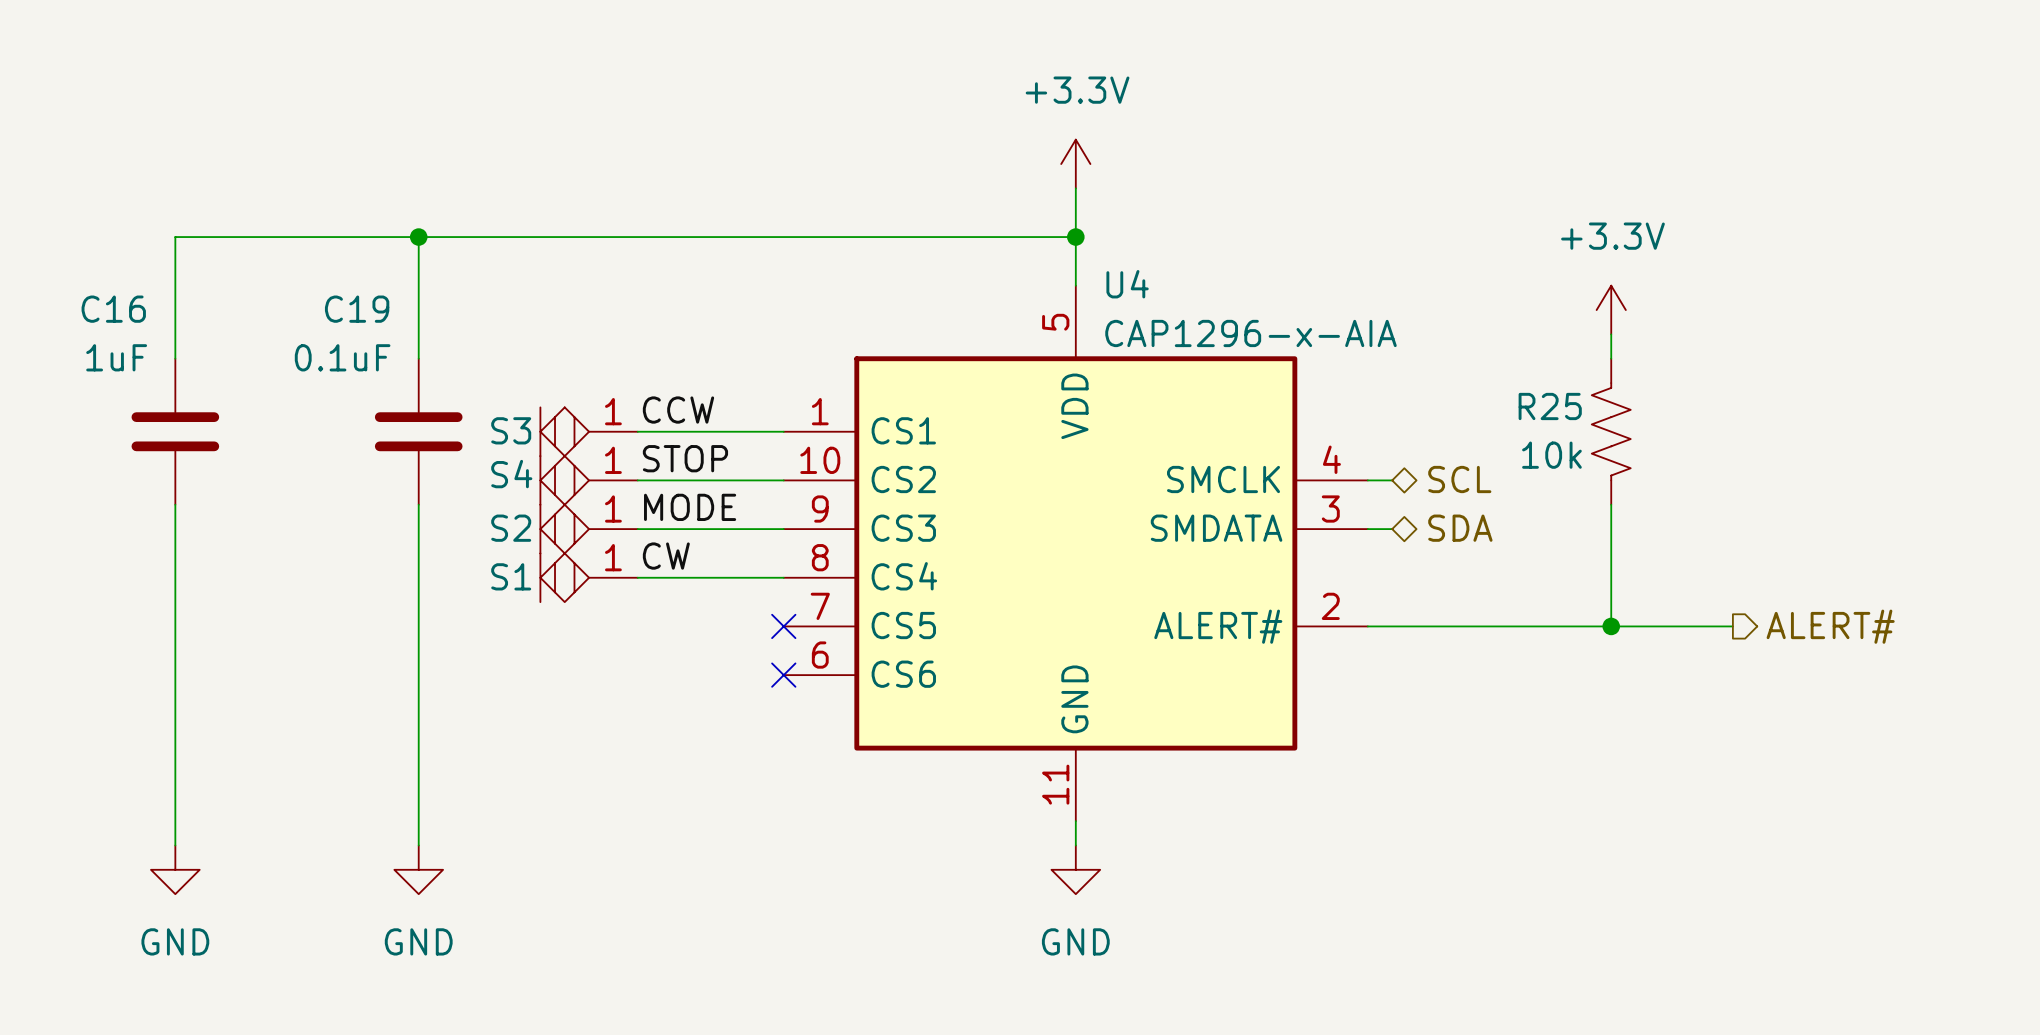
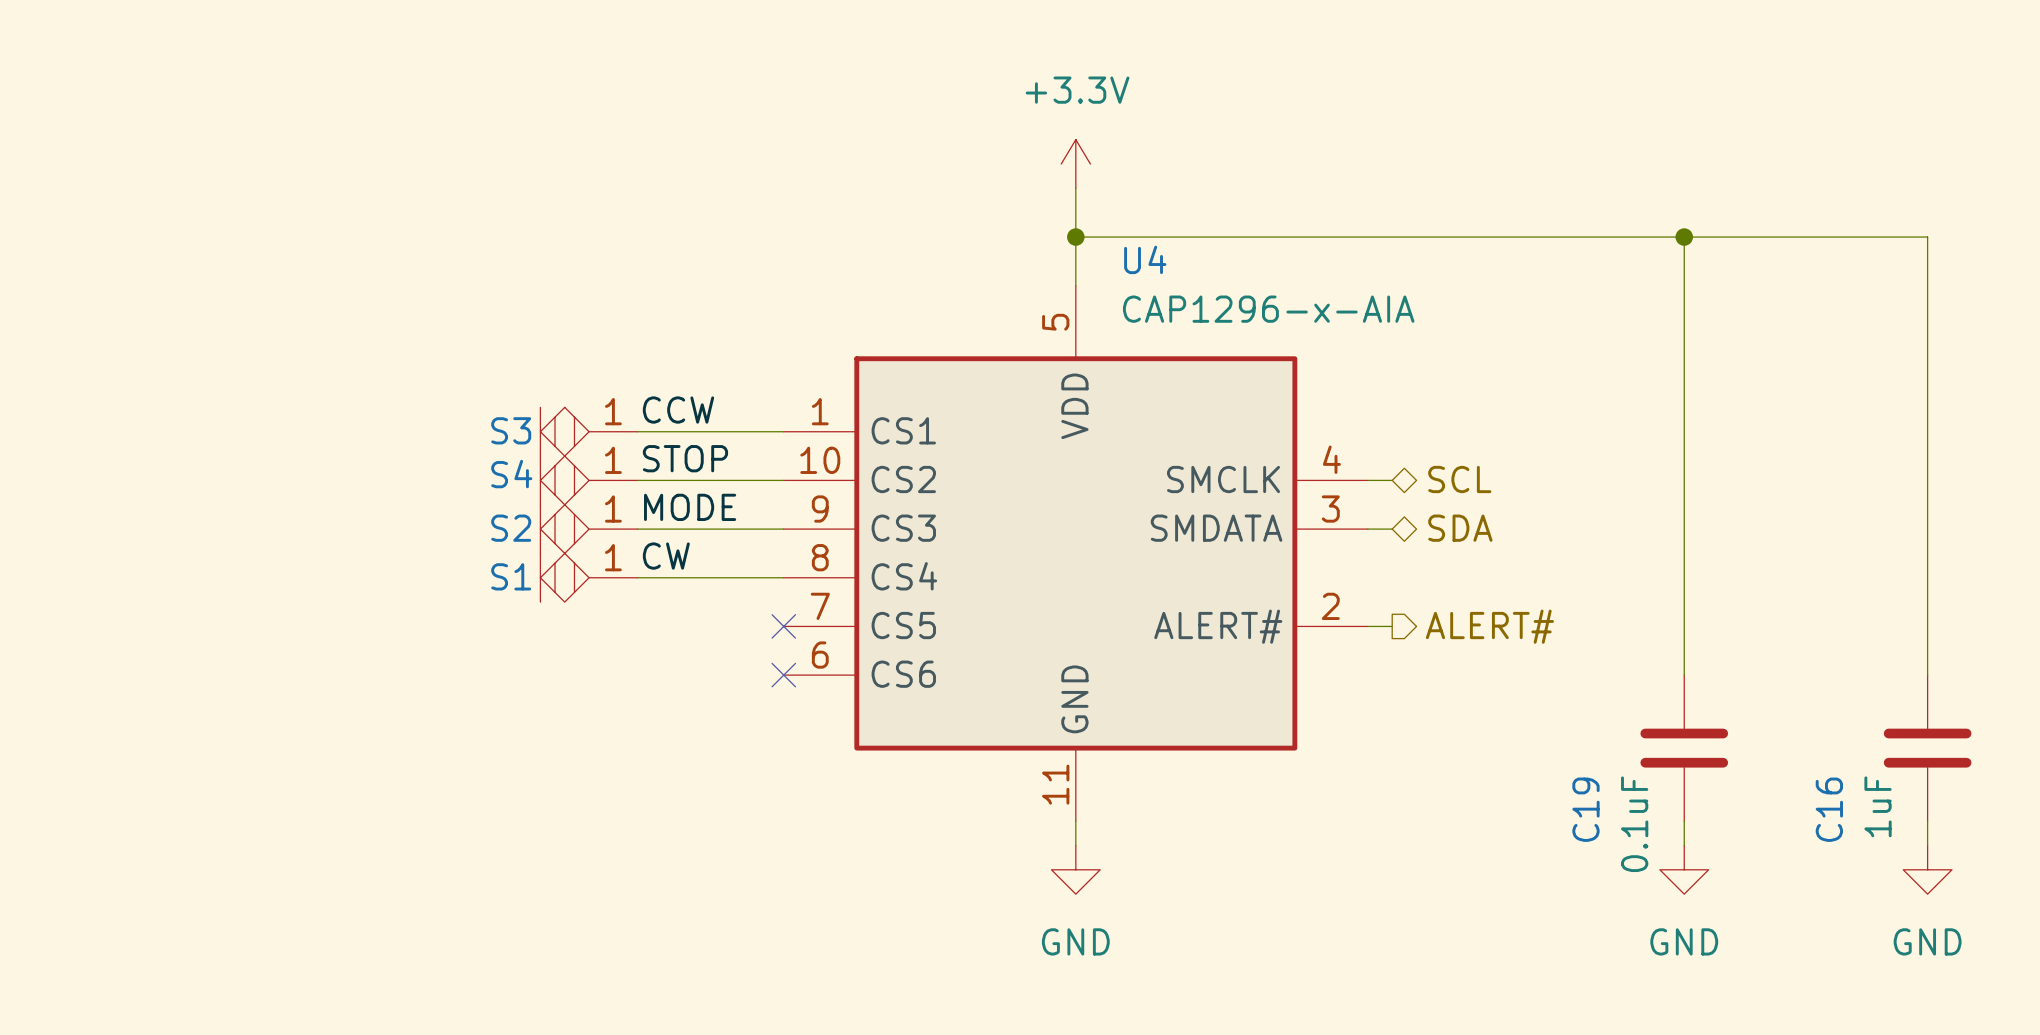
wire: (418, 237) (418, 358) -> none
junction: (418, 237) -> none
wire: (1075, 237) (175, 237) (175, 358) -> (1075, 237) (1927, 237) (1927, 675)
wire: none -> (1684, 237) (1684, 675)
junction: none -> (1684, 237)
U4 name position: U4 (1127, 284) -> U4 (1145, 259)
C16 name rotation: 0° (113, 309) -> 90° counterclockwise (1829, 809)
C16 name position: C16 (113, 309) -> C16 (1829, 809)
C19 name rotation: 0° (357, 309) -> 90° counterclockwise (1585, 809)
C19 name position: C19 (357, 309) -> C19 (1585, 809)
power symbol: +3.3V (1611, 310) -> none
U4 value position: CAP1296-x-AIA (1251, 333) -> CAP1296-x-AIA (1268, 309)
wire: (1611, 334) (1611, 358) -> none
C16 value rotation: 0° (116, 357) -> 90° counterclockwise (1878, 806)
C16 value position: 1uF (116, 357) -> 1uF (1878, 806)
C19 value rotation: 0° (342, 357) -> 90° counterclockwise (1634, 824)
C19 value position: 0.1uF (342, 357) -> 0.1uF (1634, 824)
C16 position: (175, 431) -> (1927, 748)
C19 position: (418, 431) -> (1684, 748)
R25: 10k (1611, 431) -> none
wire: (175, 504) (175, 845) -> none
wire: (418, 504) (418, 845) -> none
wire: (1611, 504) (1611, 626) -> none
wire: (1392, 626) (1732, 626) -> none
junction: (1611, 626) -> none
hierarchical label position: ALERT# (1830, 626) -> ALERT# (1489, 626)
wire: none -> (1684, 821) (1684, 845)
wire: none -> (1927, 821) (1927, 845)
power symbol: GND (175, 869) -> none
power symbol: GND (418, 869) -> none
power symbol: none -> GND (1684, 869)
power symbol: none -> GND (1927, 869)

